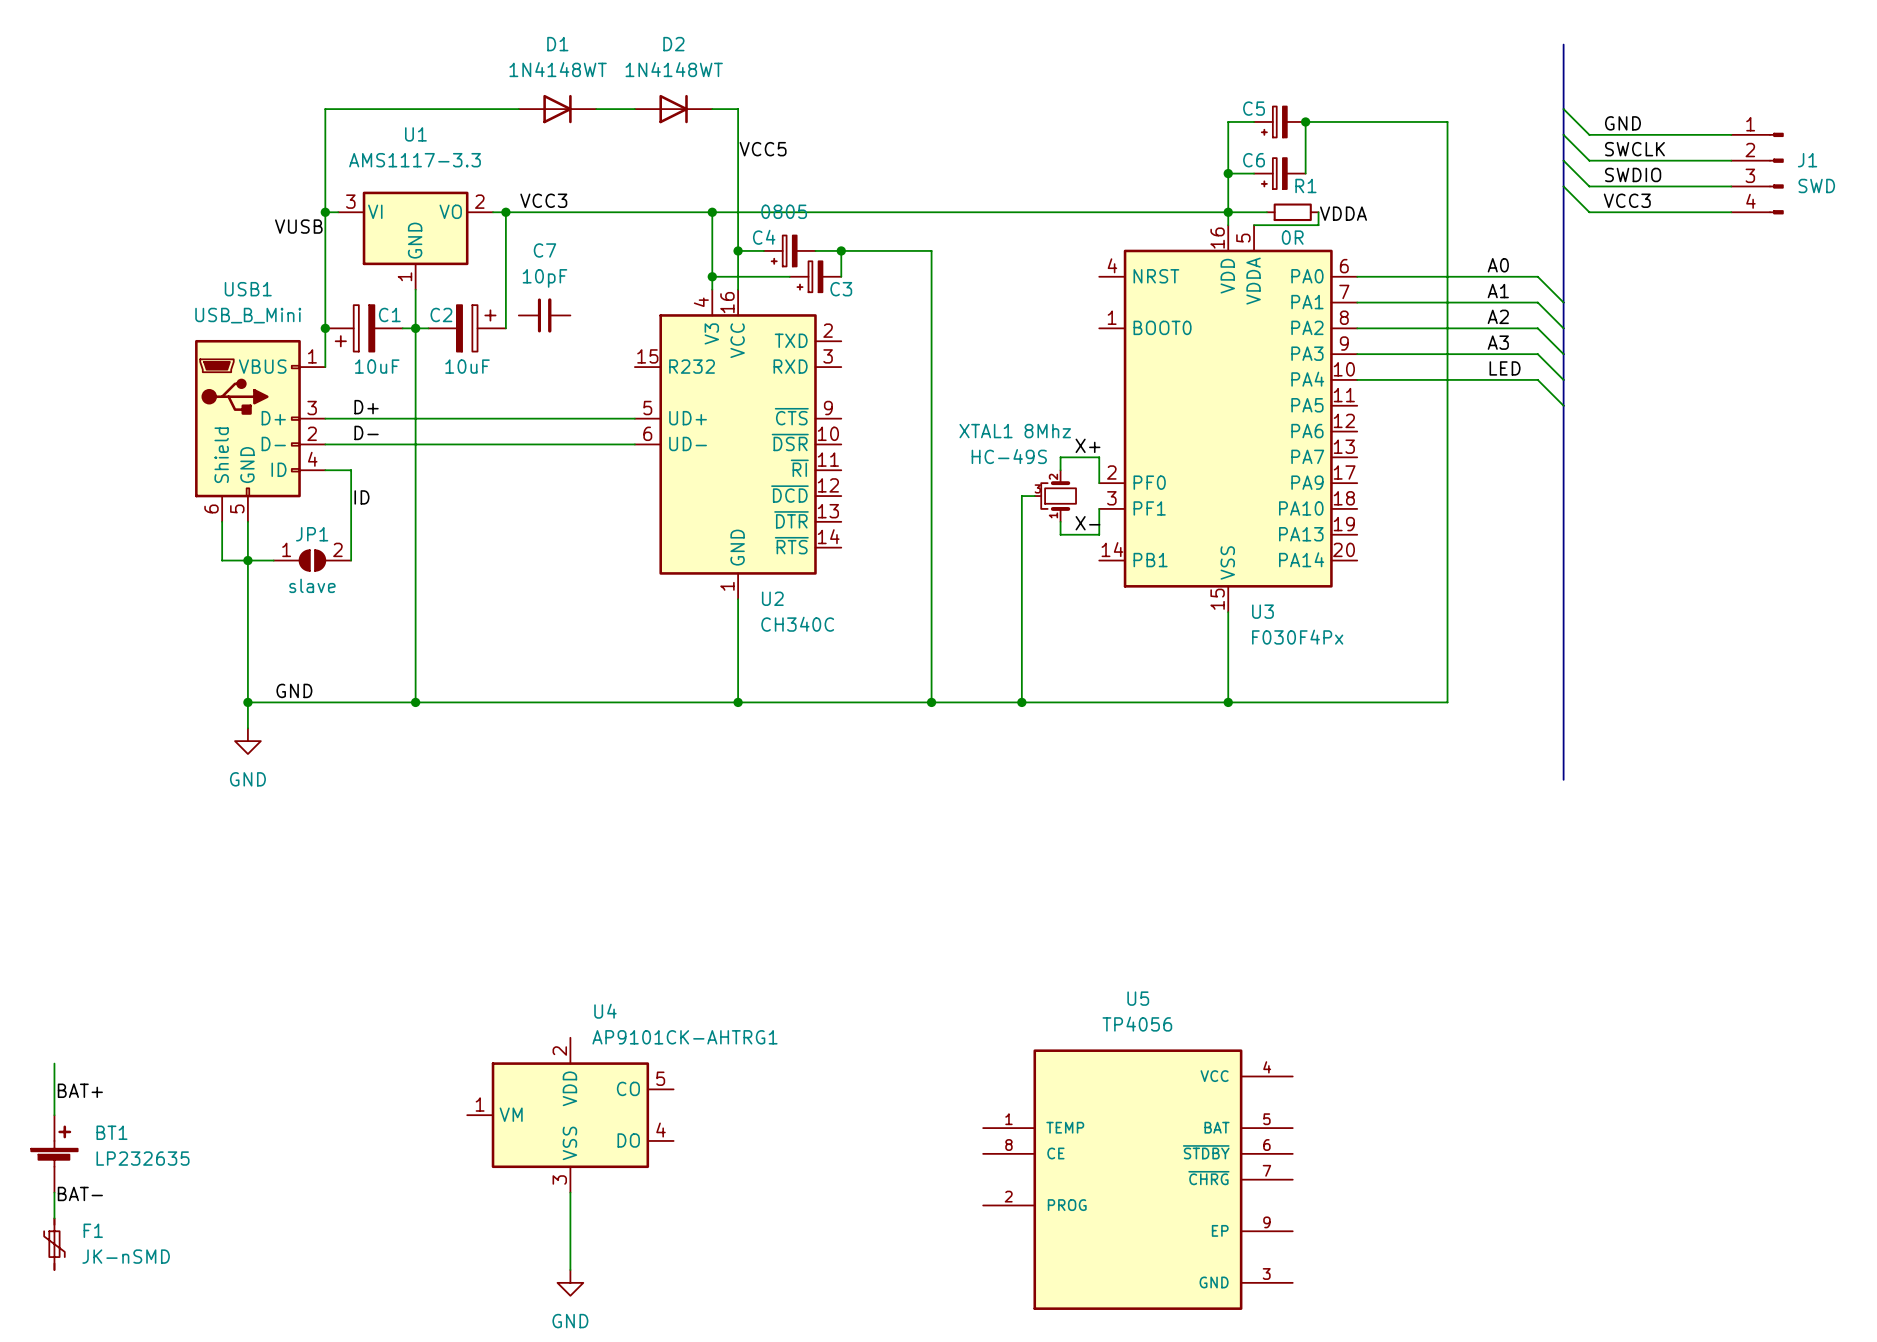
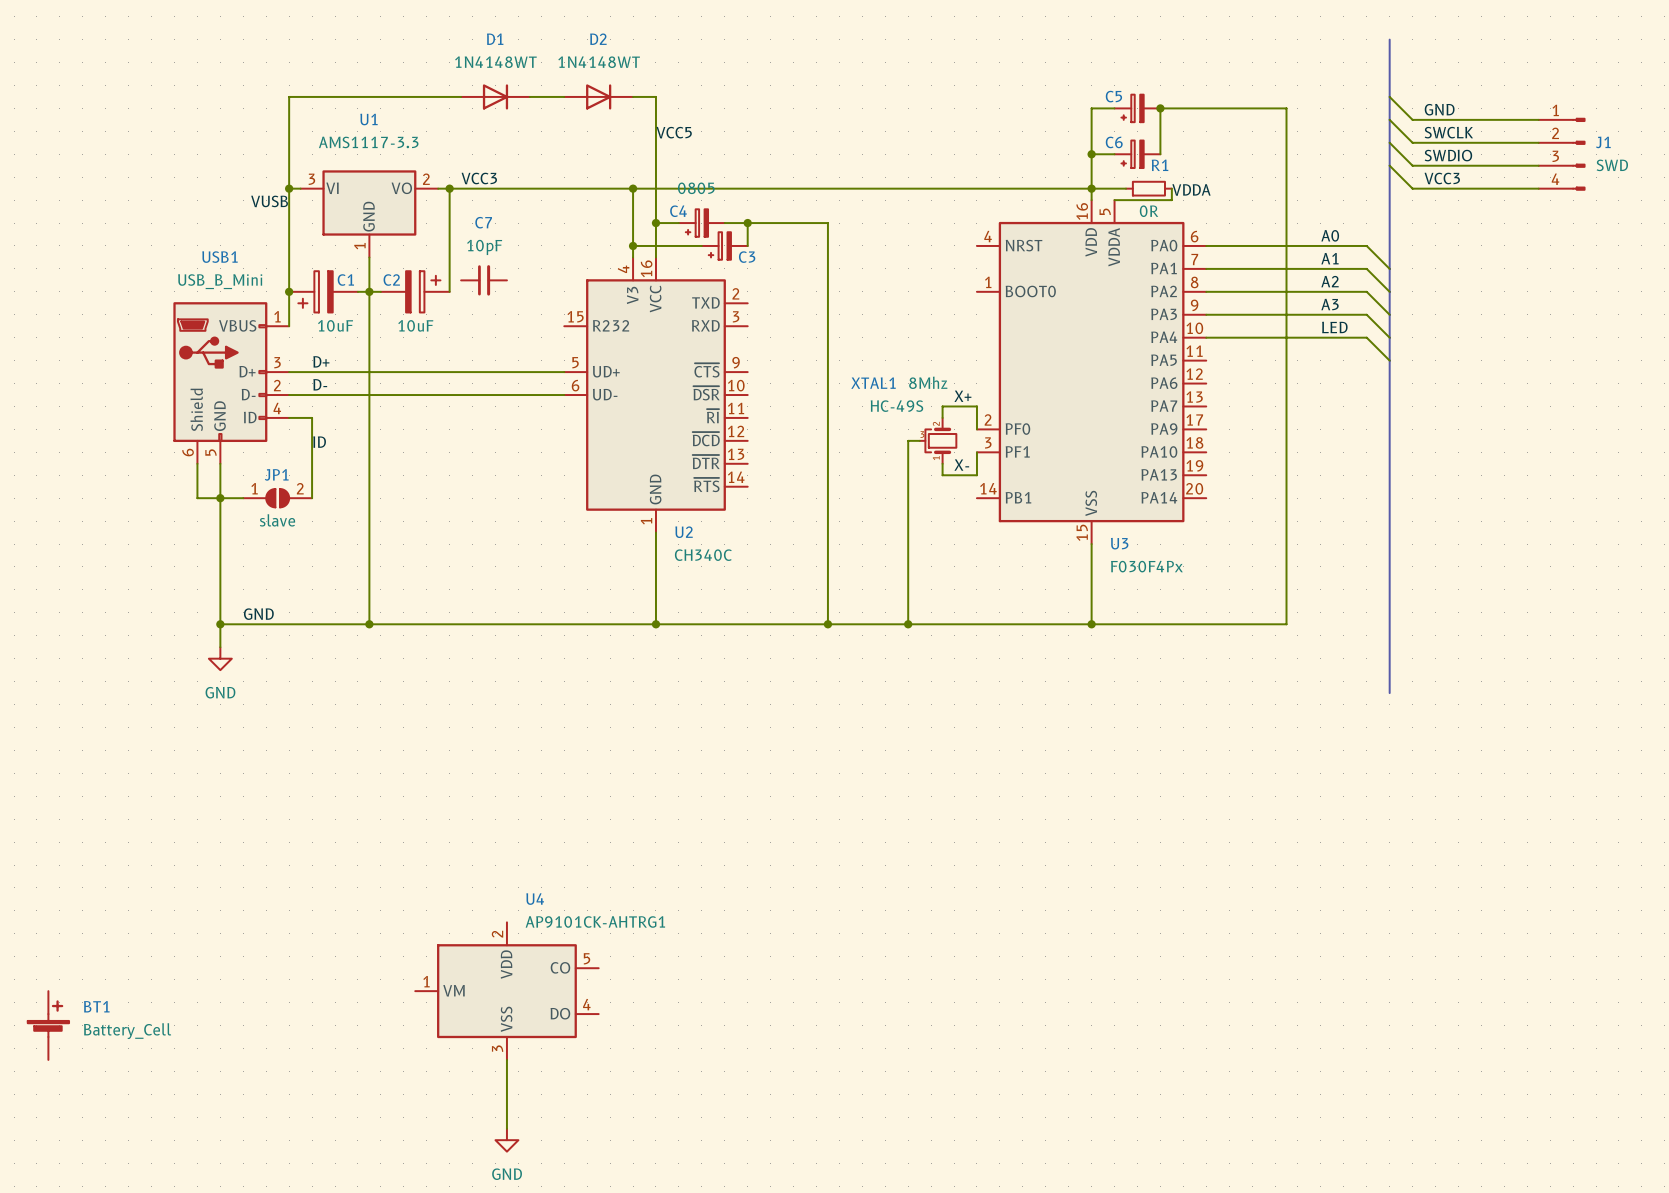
wire: (54, 1063) (54, 1115) -> none
label: BAT+ (80, 1090) -> none
BT1 value: LP232635 (143, 1158) -> Battery_Cell (127, 1031)
U5: TP4056 (1137, 1179) -> none
wire: (54, 1192) (54, 1218) -> none
label: BAT- (80, 1193) -> none
F1: JK-nSMD (54, 1244) -> none

